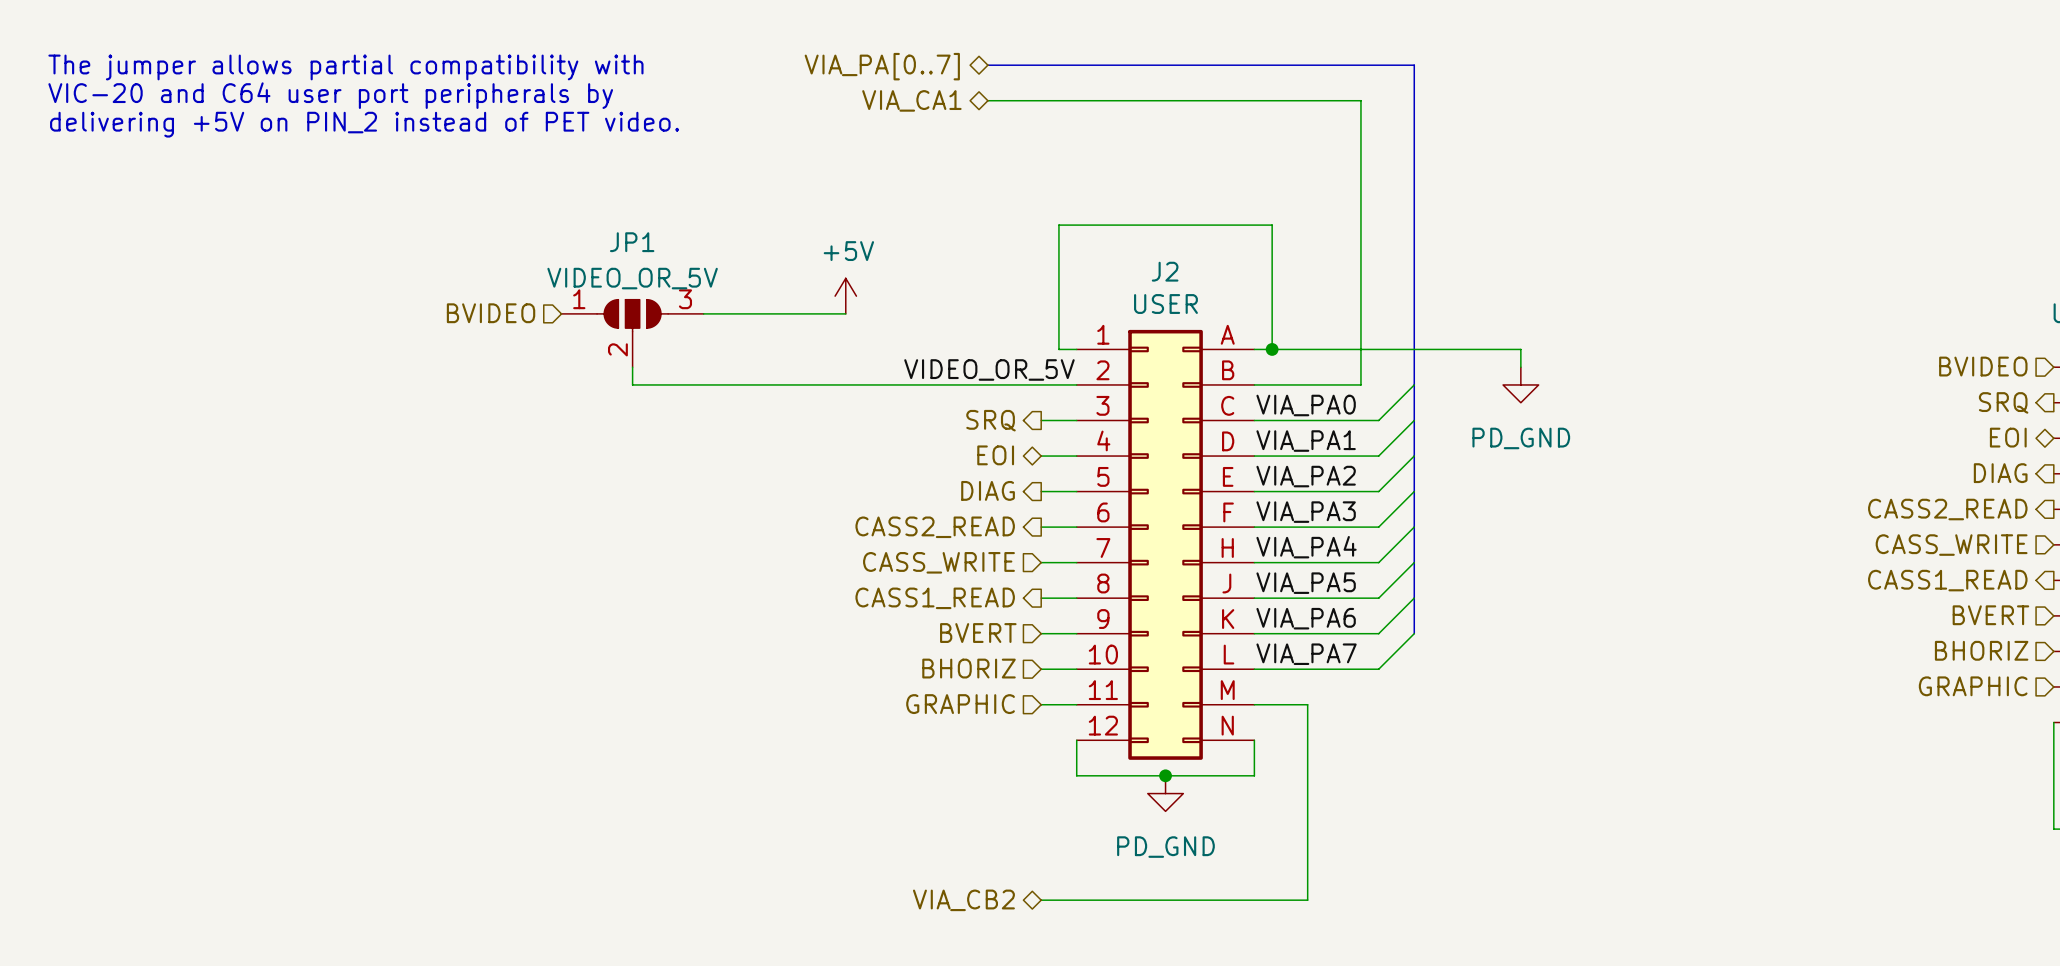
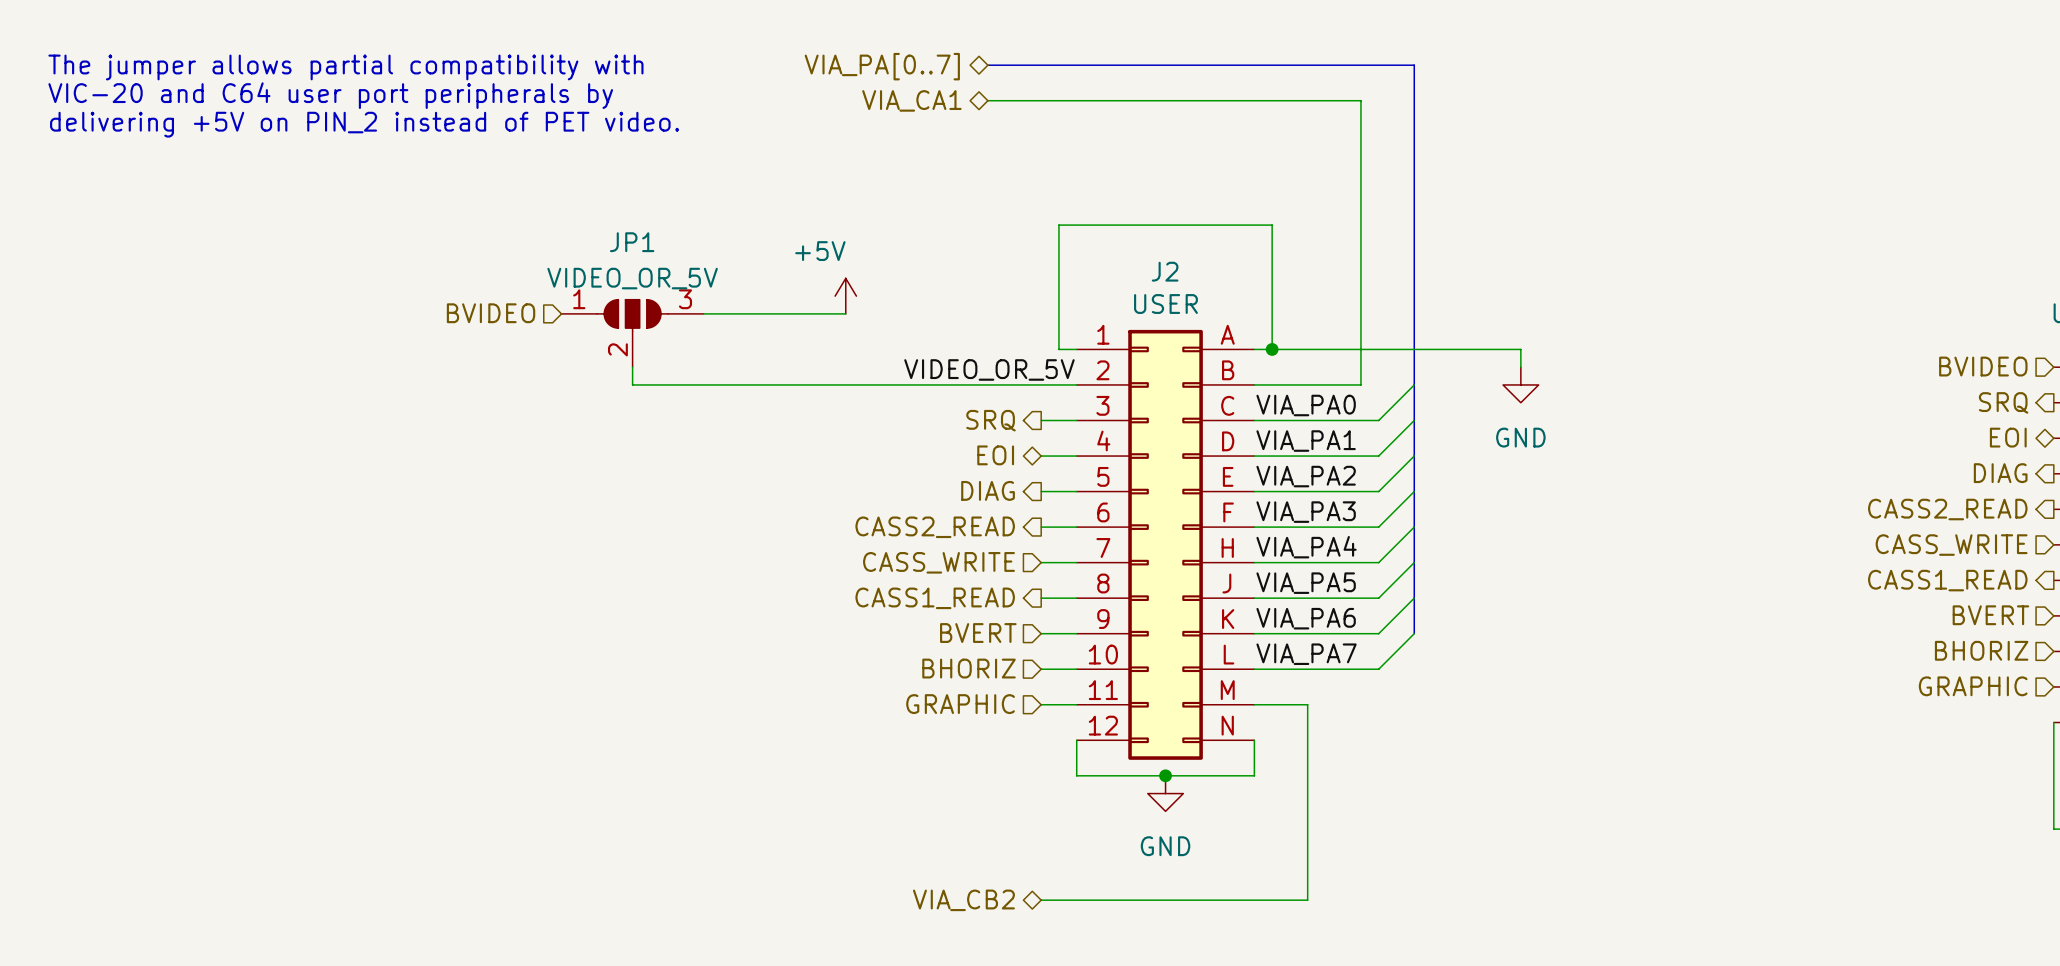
power symbol text position: +5V (848, 251) -> +5V (820, 251)
power symbol: PD_GND (1520, 384) -> GND (1520, 384)
power symbol: PD_GND (1165, 793) -> GND (1165, 793)

